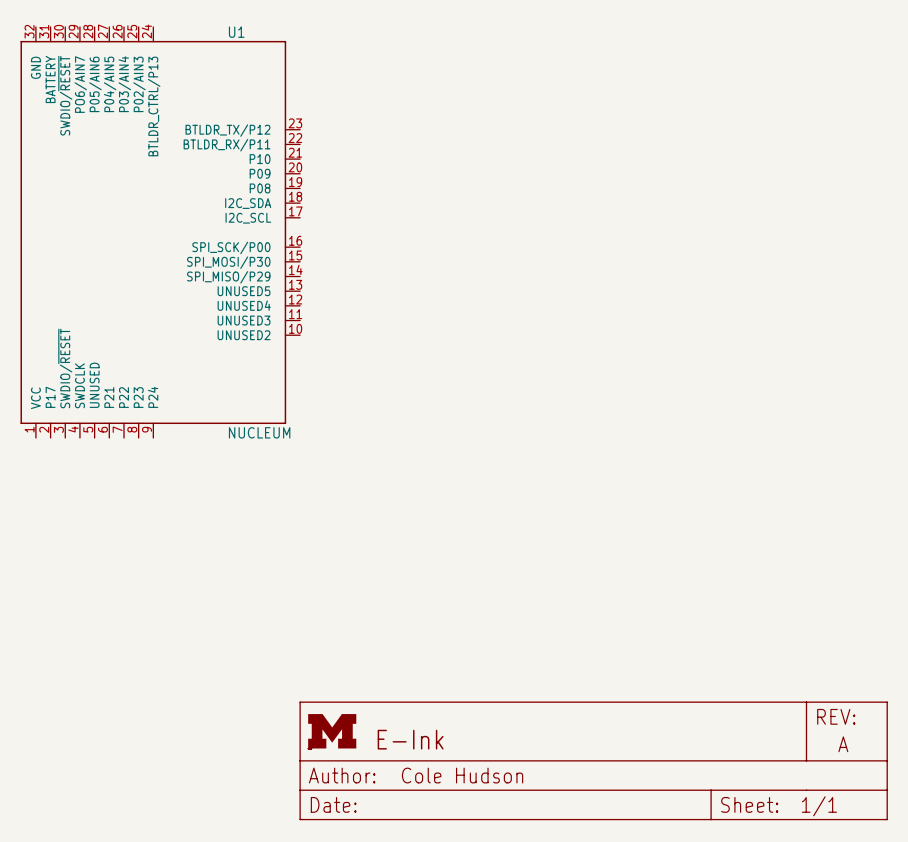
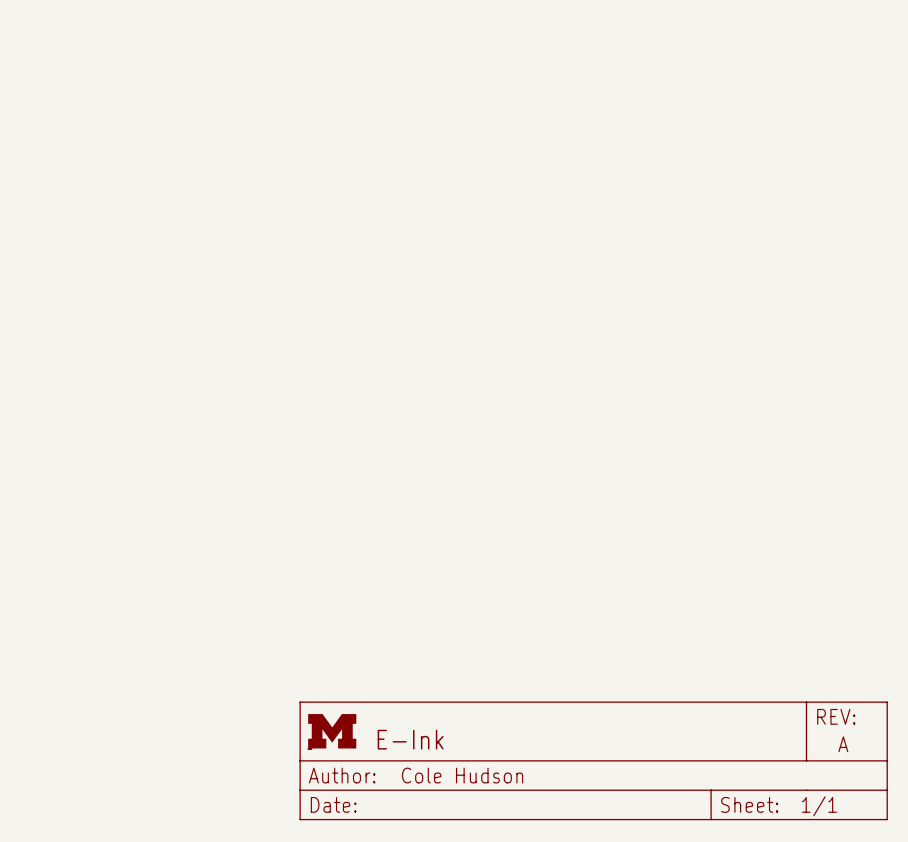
U1: NUCLEUM (160, 232) -> none

